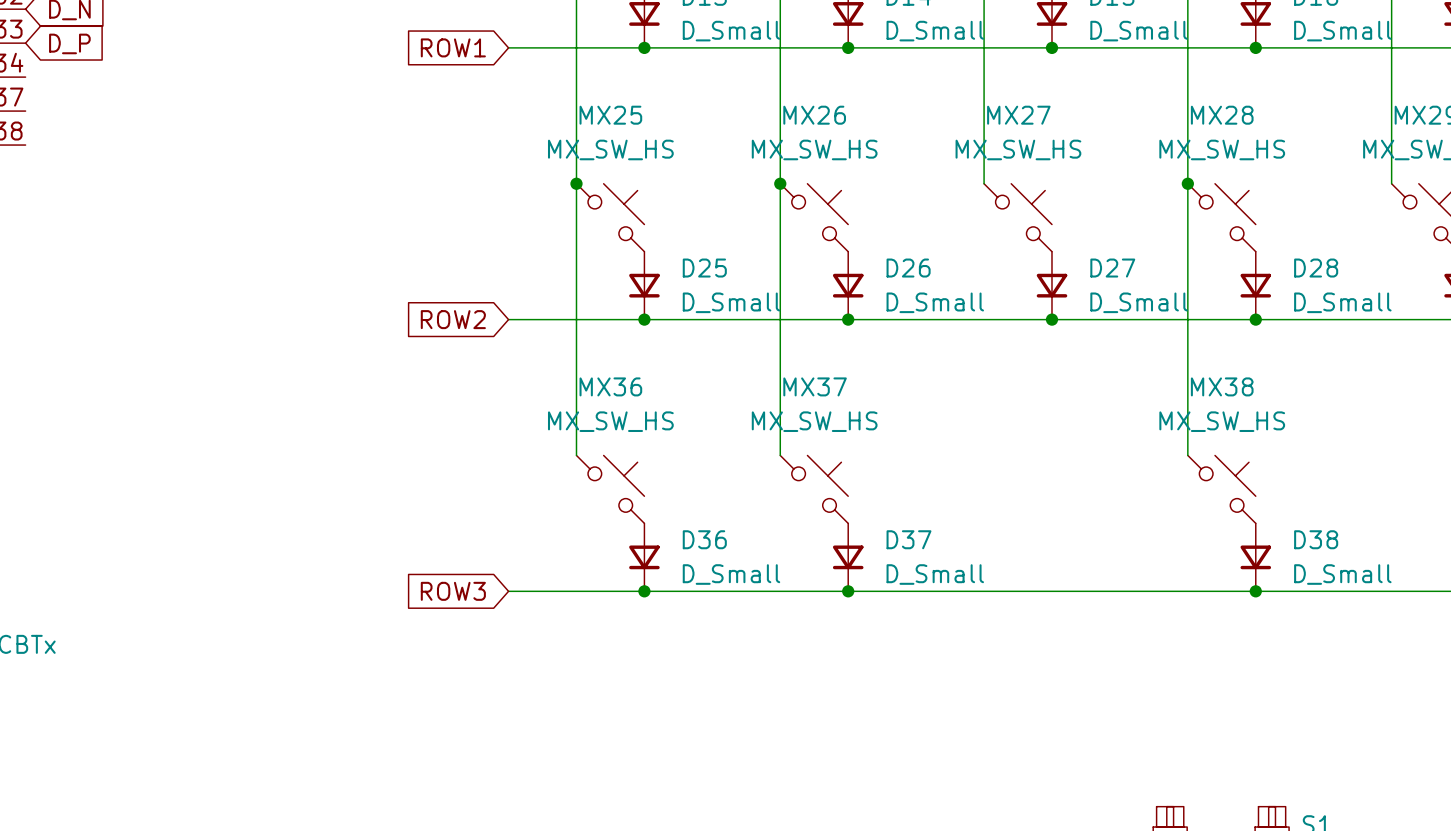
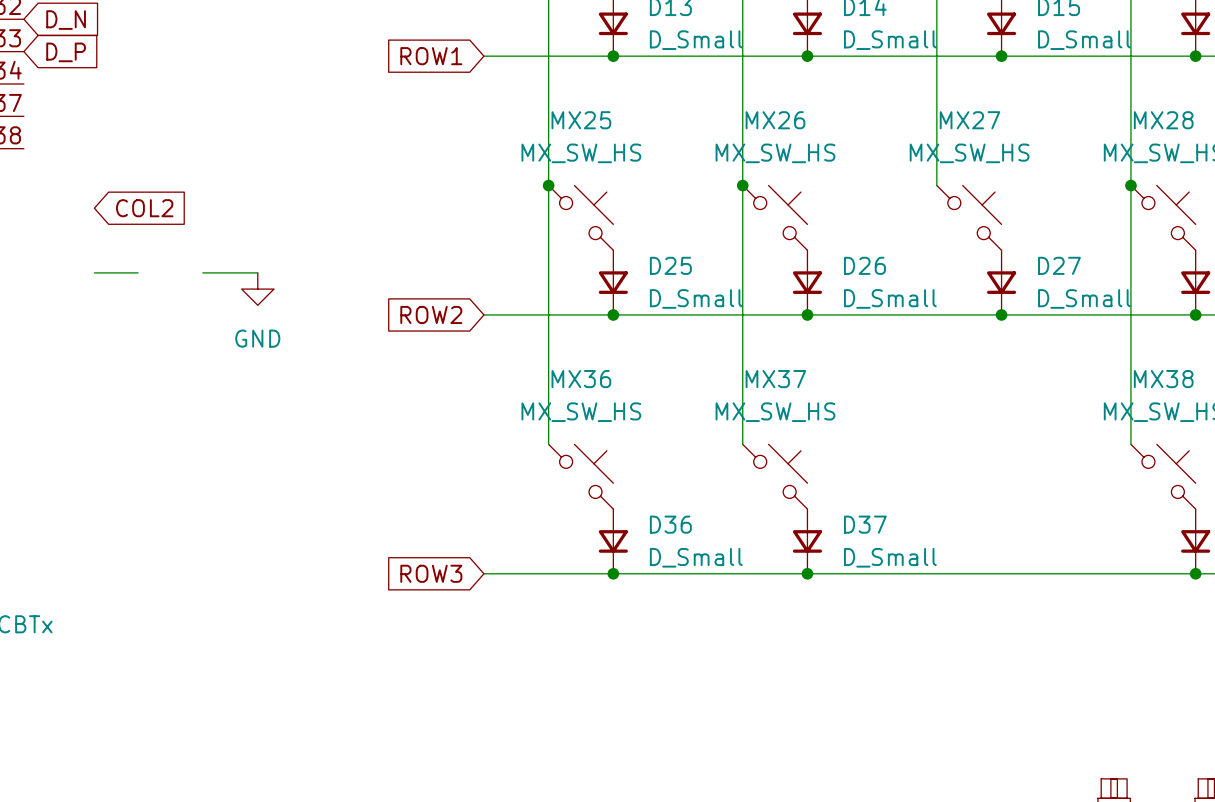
global label: none -> COL2 (144, 208)
wire: none -> (94, 272) (138, 272)
wire: none -> (202, 272) (257, 272)
power symbol: none -> GND (257, 289)

